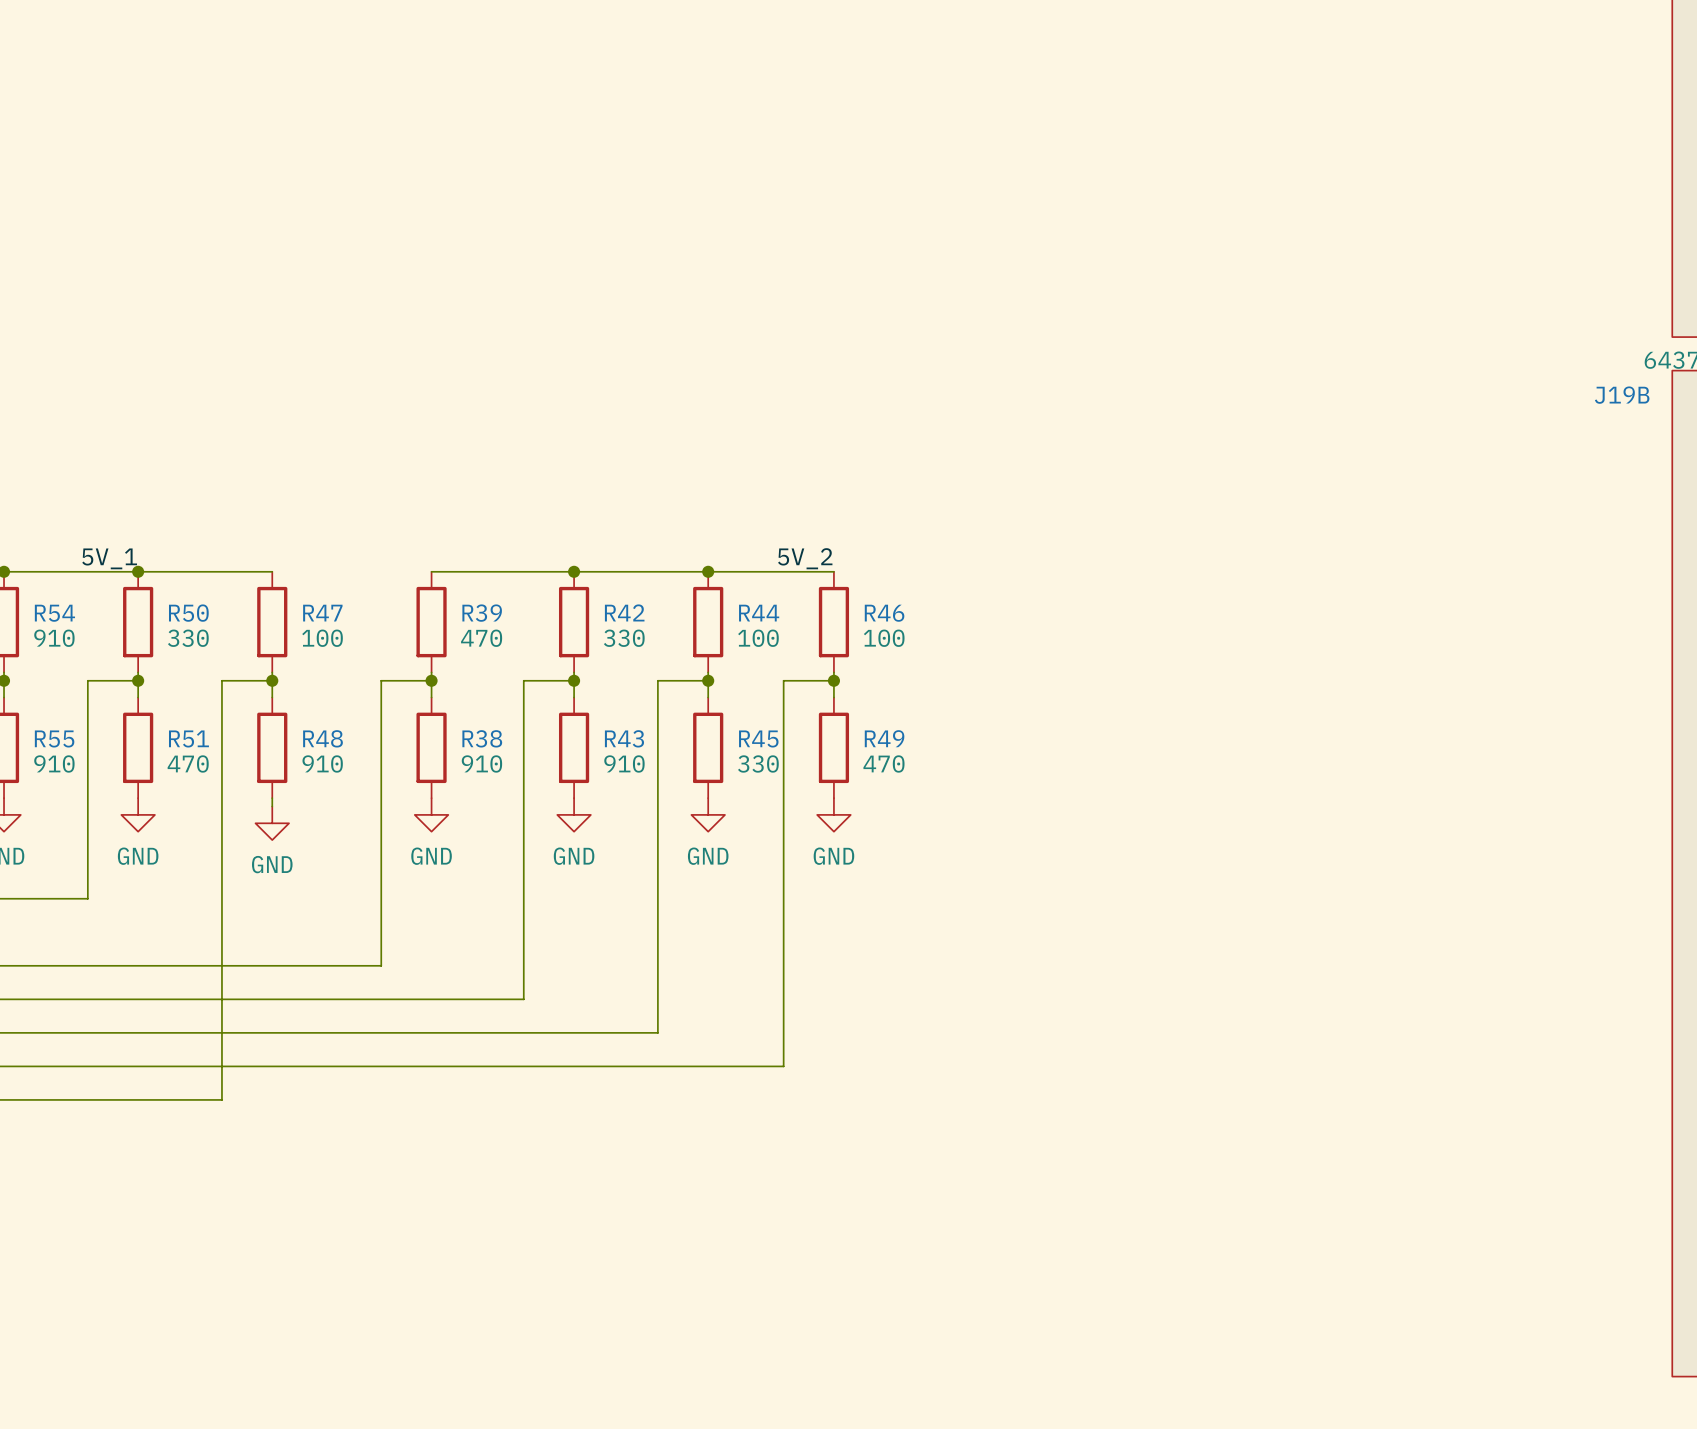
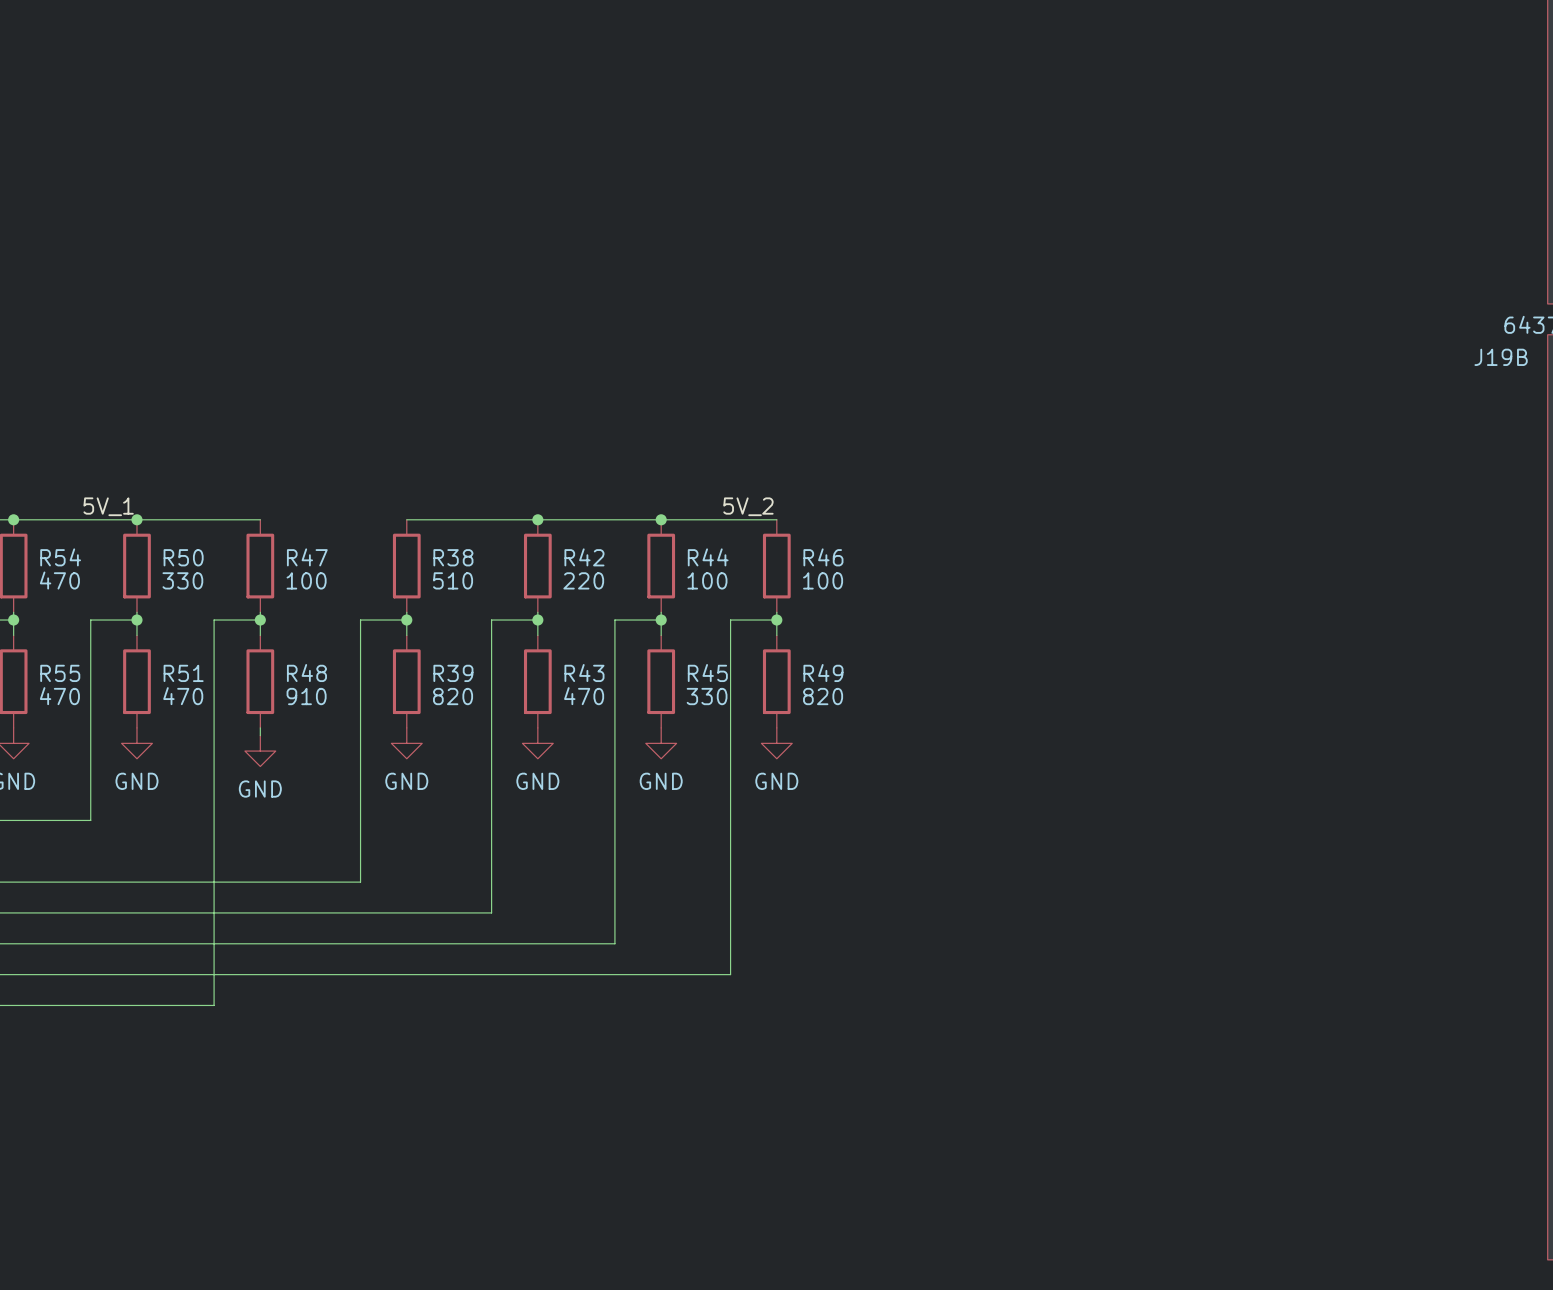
R39 name: R39 (482, 613) -> R38 (453, 557)
R54 value: 910 (54, 638) -> 470 (59, 580)
R39 value: 470 (481, 638) -> 510 (453, 580)
R42 value: 330 (624, 638) -> 220 (583, 580)
R38 name: R38 (482, 738) -> R39 (453, 673)
R55 value: 910 (54, 763) -> 470 (59, 696)
R38 value: 910 (481, 763) -> 820 (453, 696)
R43 value: 910 (624, 763) -> 470 (584, 696)
R49 value: 470 (883, 763) -> 820 (823, 696)

